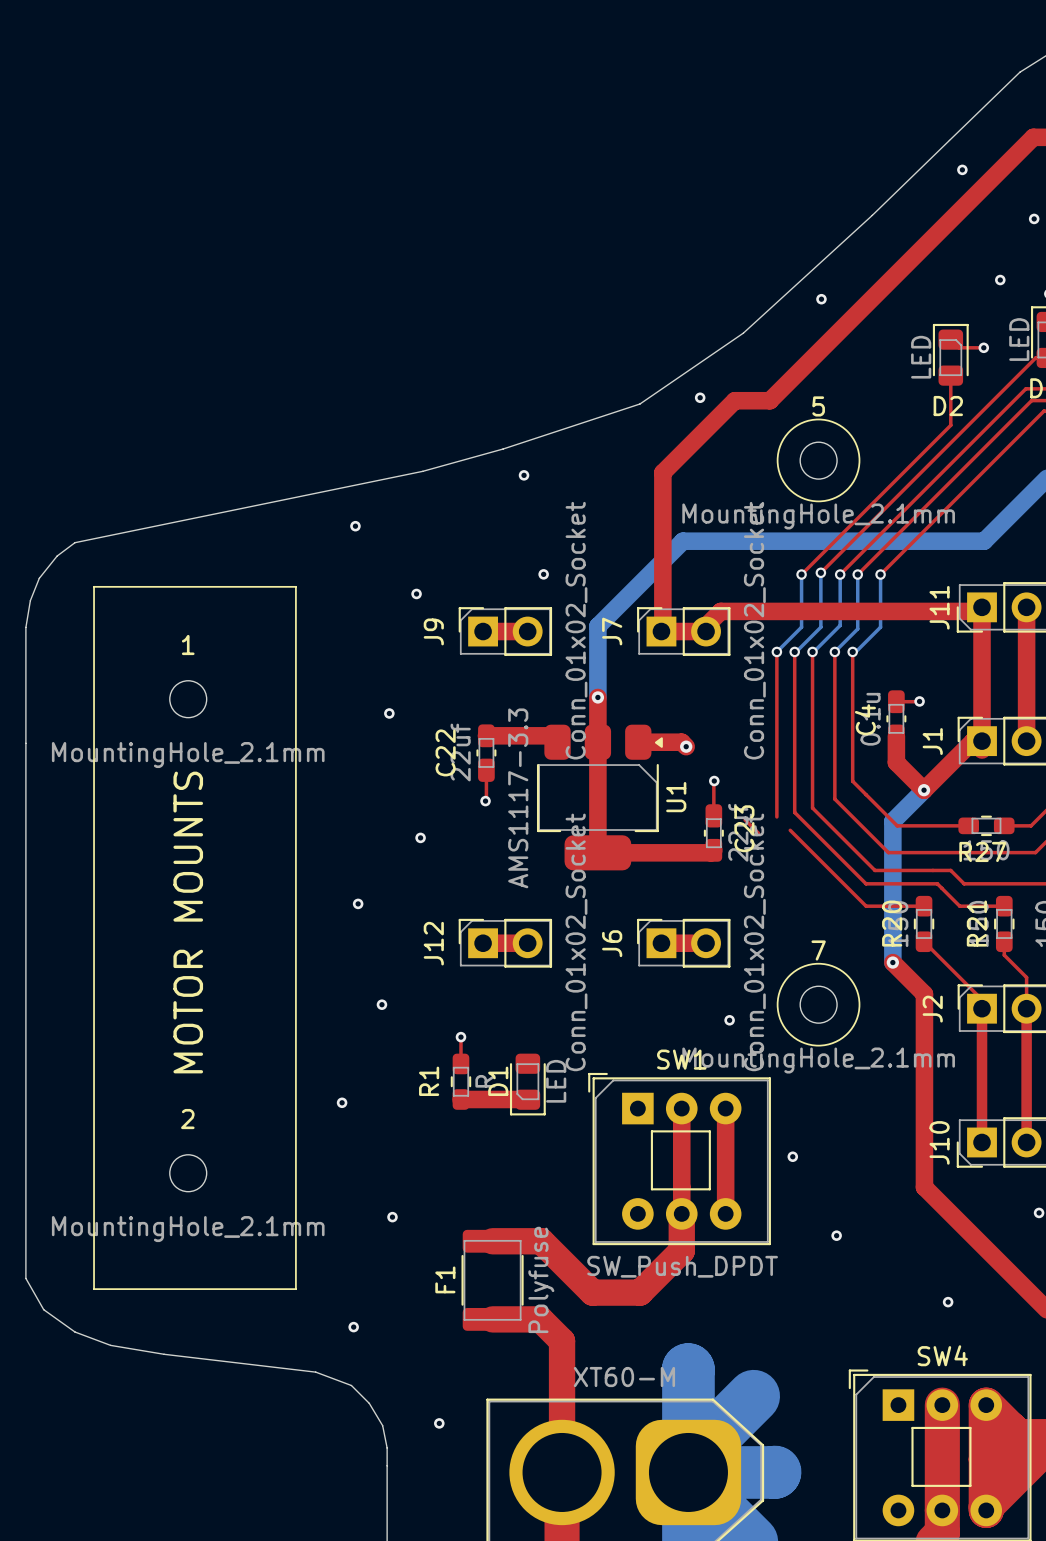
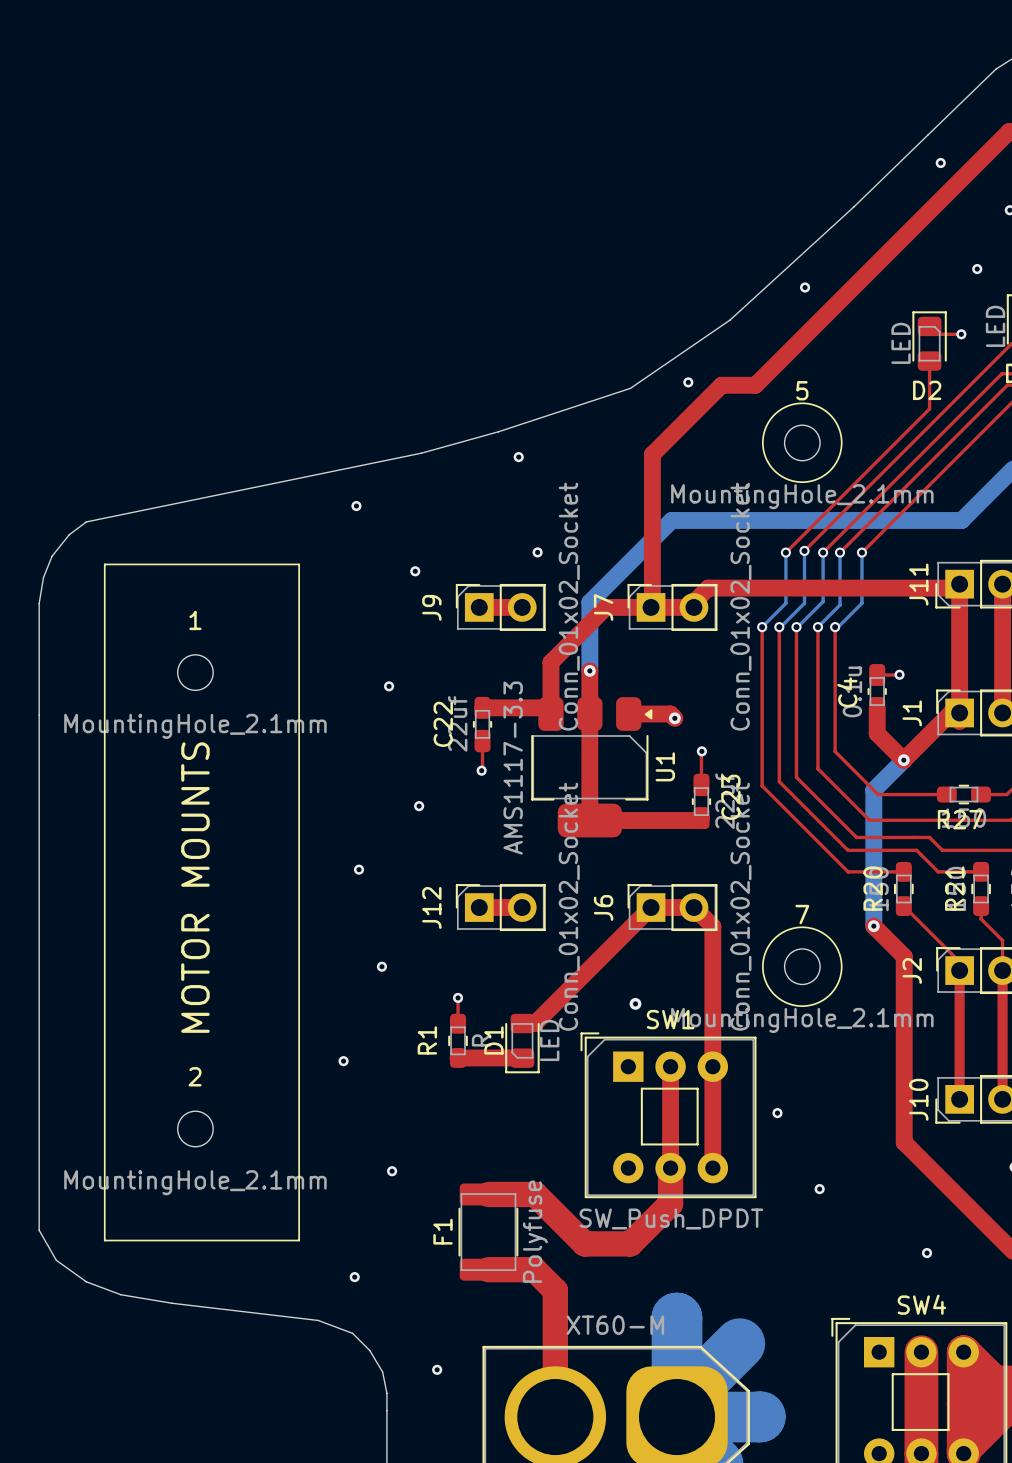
top track: none -> (651, 607) (605, 607) (550, 662) (550, 714)
top track: (745, 819) (758, 833) -> (762, 785) (775, 798)
top track: none -> (651, 907) (535, 1023) (522, 1023)
top track: none -> (693, 907) (712, 926) (712, 1066)
via: (729, 1020) -> none
via: none -> (635, 1003)

